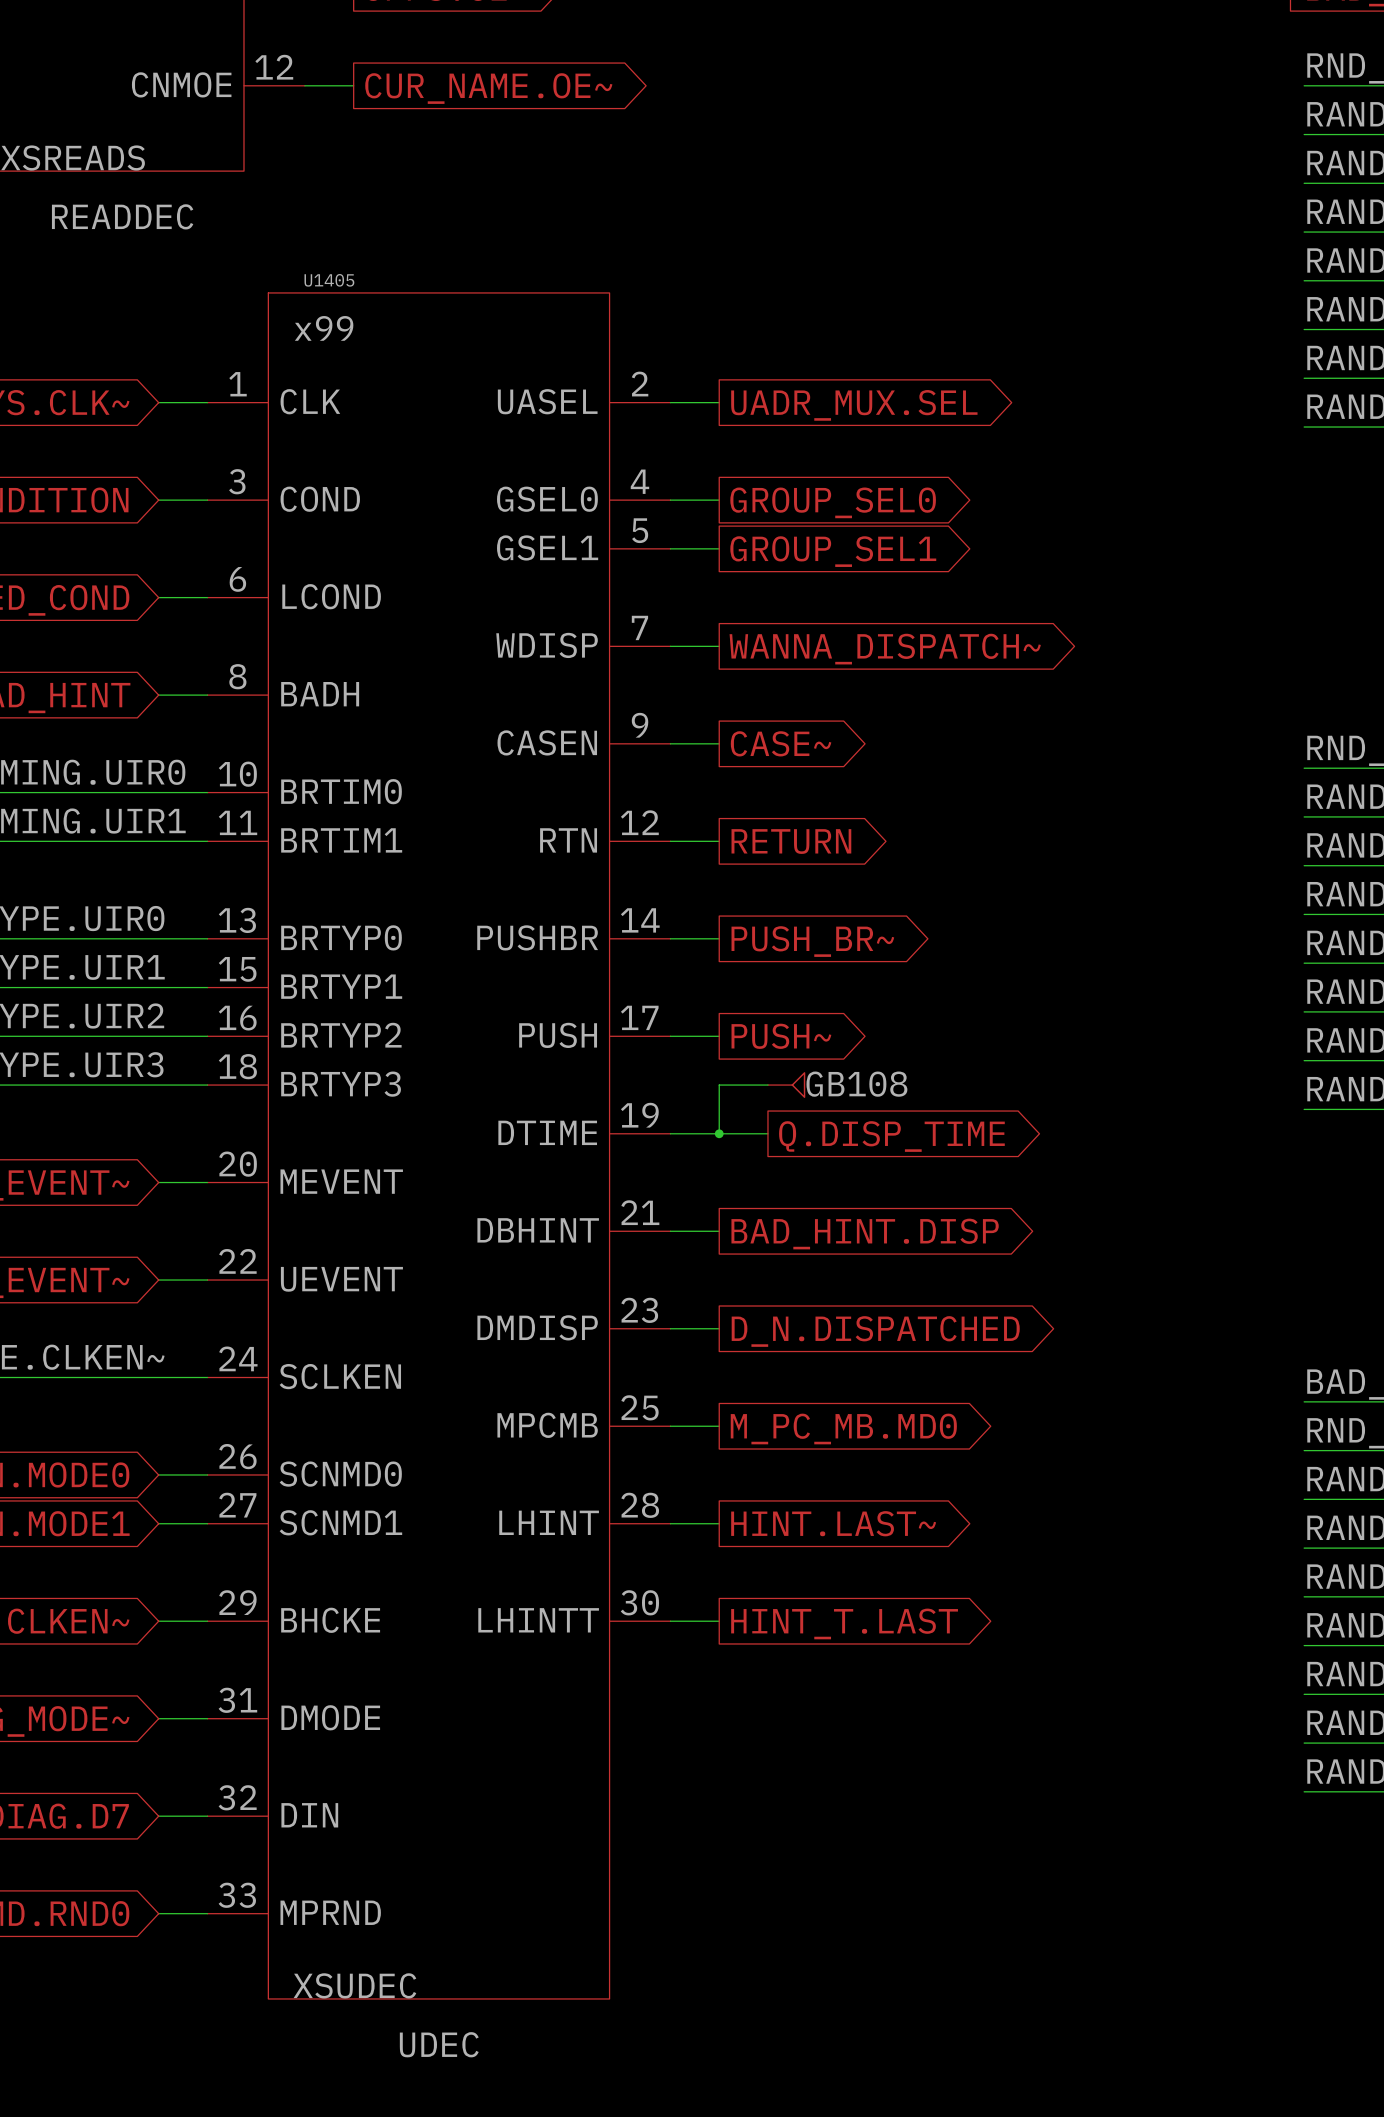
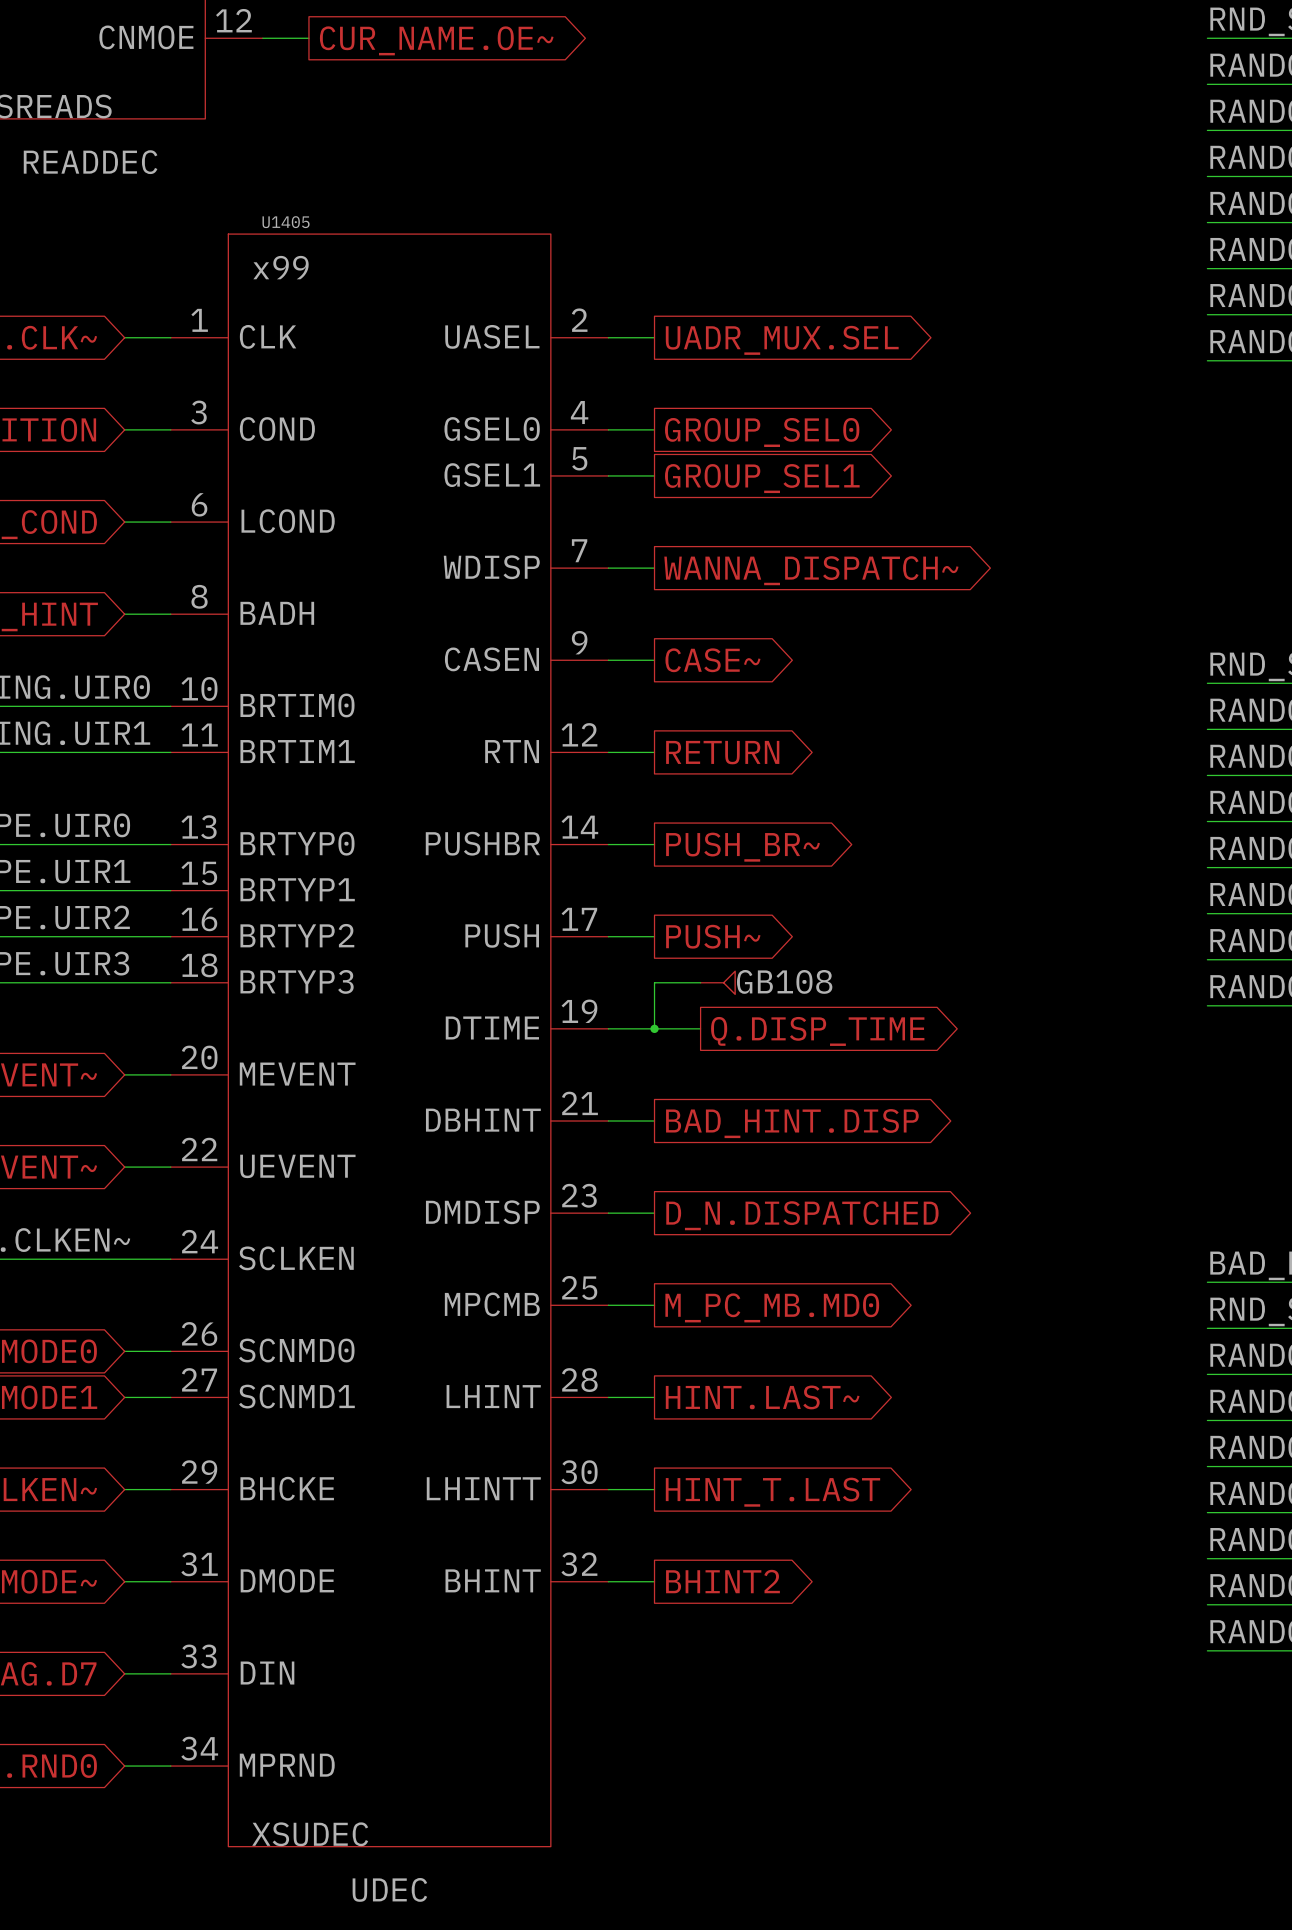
U1405 symbol: [207, 292, 671, 1999] -> [170, 234, 609, 1847]
wire: none -> (608, 1581) (654, 1581)
global label: none -> BHINT2 (722, 1581)

